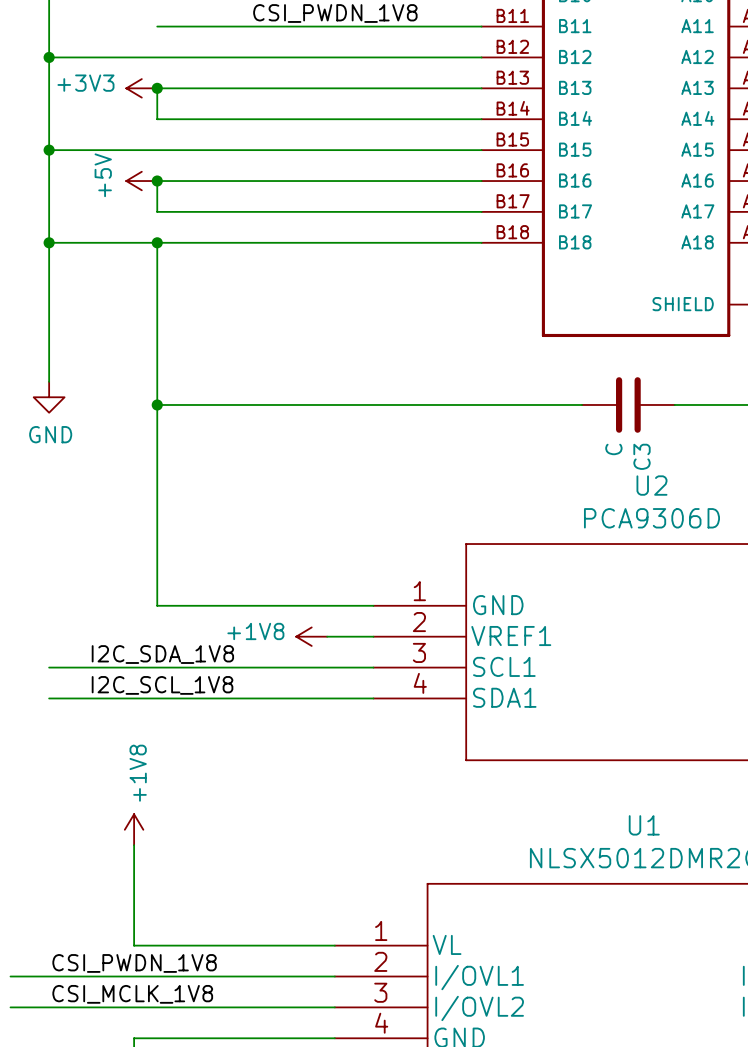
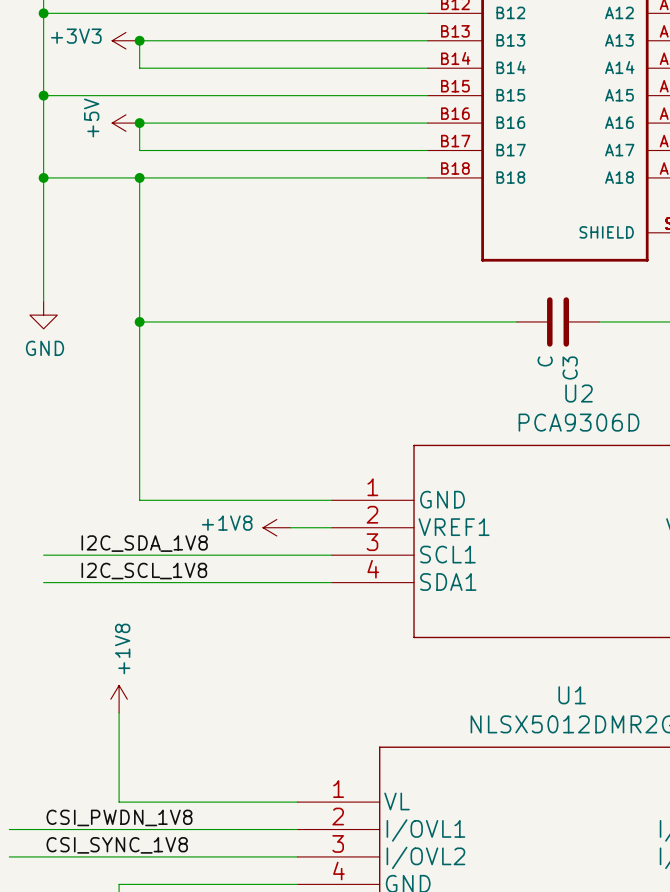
label: CSI_MCLK_1V8 (132, 994) -> CSI_SYNC_1V8 (117, 845)

